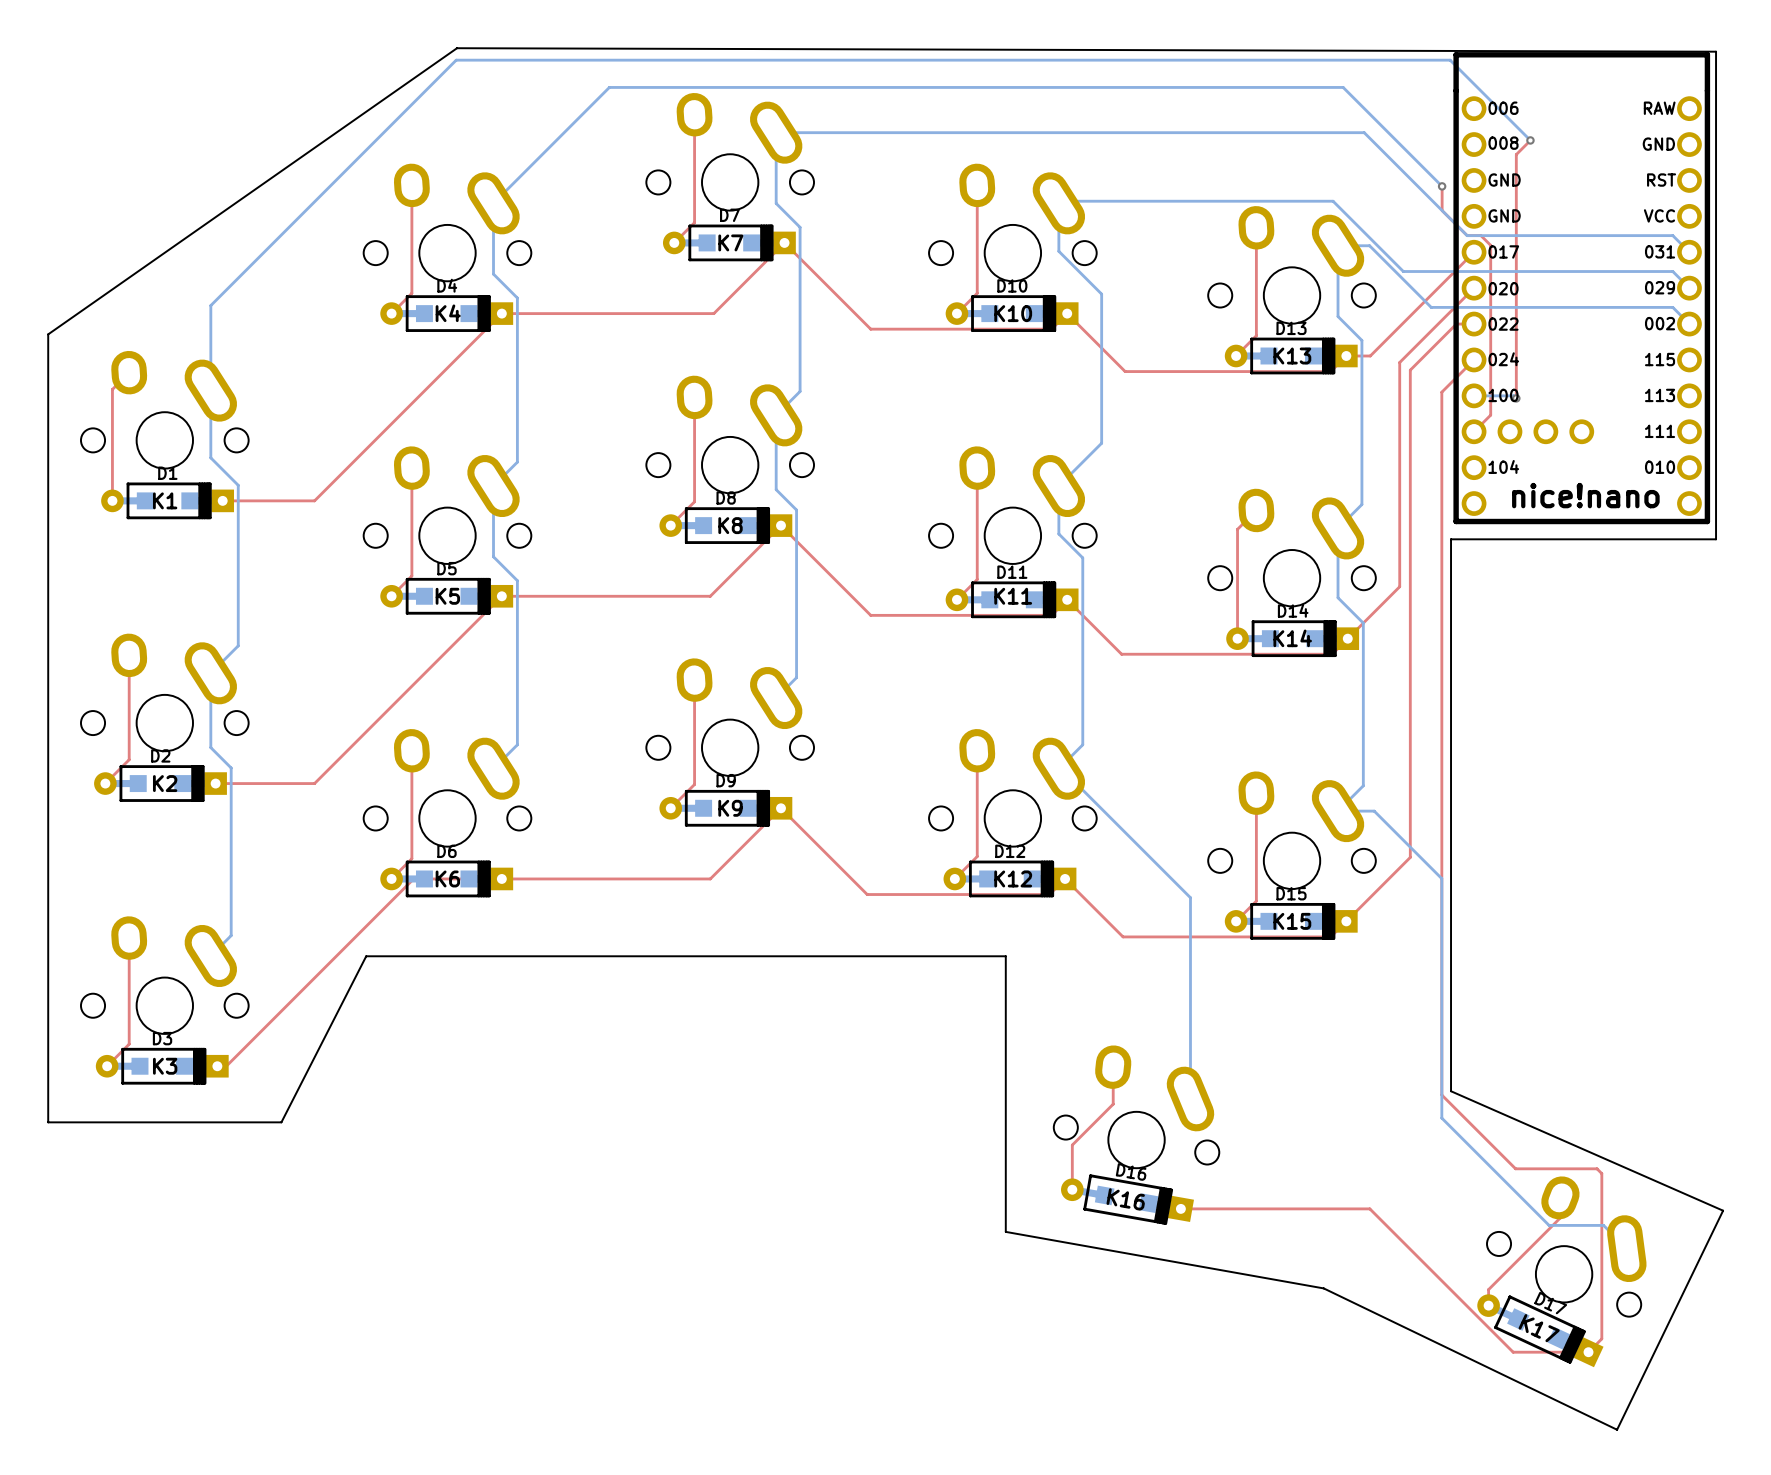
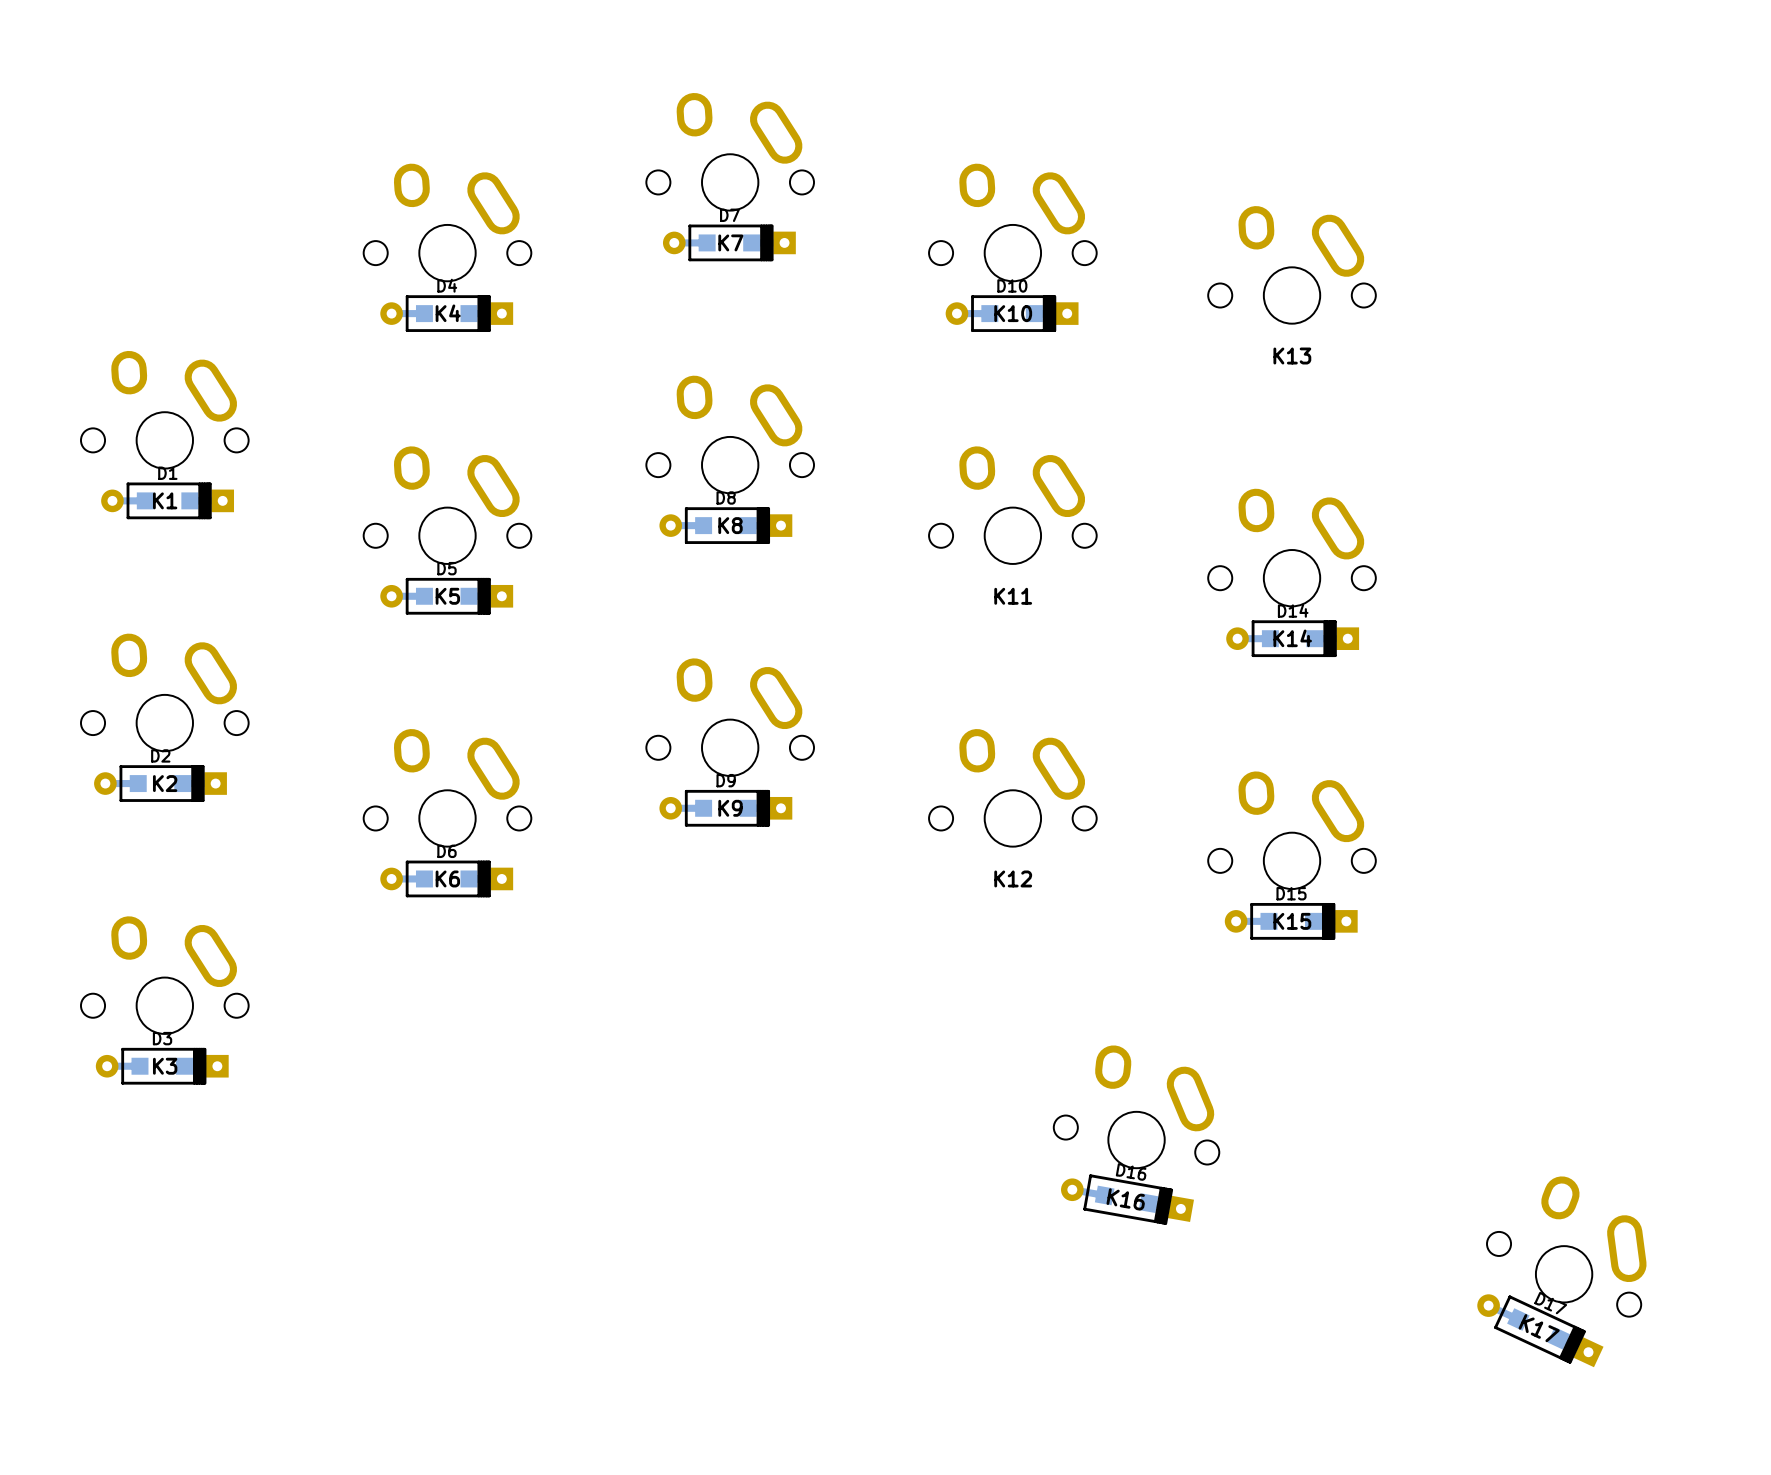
board edge: (457, 48) (1716, 51) (1716, 539) (1451, 539) (1451, 1091) (1723, 1210) (1617, 1429) (1323, 1288) (1005, 1231) (1005, 956) (366, 956) (281, 1122) (48, 1122) (48, 334) (457, 48) -> none
top track: (694, 114) (694, 222) (674, 242) -> none
top track: (1530, 140) (1516, 154) (1516, 398) -> none
bottom track: (1530, 140) (1450, 60) (456, 60) (210, 305) (210, 457) (238, 485) (238, 645) (210, 673) (210, 747) (231, 767) (231, 935) (210, 955) -> none
via: (1530, 140) -> none
top track: (411, 185) (411, 293) (391, 313) -> none
top track: (977, 185) (977, 293) (956, 313) -> none
top track: (1442, 186) (1442, 210) (1467, 235) (1480, 235) (1490, 245) (1490, 415) (1474, 431) -> none
bottom track: (1442, 186) (1343, 87) (609, 87) (493, 203) (493, 274) (517, 298) (517, 462) (493, 486) (493, 556) (517, 580) (517, 744) (493, 768) -> none
via: (1442, 186) -> none
top track: (1256, 227) (1256, 335) (1236, 356) -> none
top track: (1474, 252) (1370, 356) (1346, 356) (1330, 371) (1125, 371) (1067, 313) (1051, 329) (870, 329) (784, 242) (713, 313) (501, 313) (314, 500) (222, 500) -> none
bottom track: (1689, 252) (1672, 235) (1467, 235) (1364, 132) (776, 132) (776, 203) (800, 227) (800, 391) (776, 415) (776, 489) (796, 510) (796, 677) (776, 698) -> none
top track: (1474, 288) (1399, 362) (1399, 586) (1332, 654) (1121, 654) (1067, 599) (1051, 615) (870, 615) (780, 525) (710, 596) (501, 596) (314, 783) (215, 783) -> none
part: (1581, 288) -> none
bottom track: (1689, 288) (1672, 271) (1403, 271) (1333, 201) (1061, 201) (1058, 203) (1058, 251) (1101, 294) (1101, 443) (1058, 486) (1058, 534) (1082, 557) (1082, 744) (1058, 768) (1061, 768) (1190, 897) (1190, 1099) -> none
top track: (1474, 324) (1456, 324) (1410, 370) (1410, 857) (1330, 936) (1123, 936) (1065, 878) (1049, 894) (867, 894) (780, 808) (710, 878) (413, 878) (226, 1066) (217, 1066) -> none
bottom track: (1689, 324) (1672, 307) (1431, 307) (1369, 245) (1338, 245) (1338, 316) (1361, 340) (1361, 504) (1338, 528) (1338, 597) (1363, 623) (1363, 785) (1338, 811) (1374, 811) (1441, 878) (1441, 1118) (1549, 1225) (1603, 1225) (1626, 1248) -> none
D13: (1291, 356) -> none
top track: (1474, 359) (1441, 392) (1441, 1095) (1515, 1168) (1597, 1168) (1601, 1173) (1601, 1338) (1588, 1352) (1513, 1352) (1369, 1208) (1180, 1208) -> none
top track: (129, 372) (112, 389) (112, 500) -> none
bottom track: (1474, 395) (1513, 395) (1516, 398) -> none
top track: (694, 397) (694, 501) (670, 525) -> none
via: (1516, 398) -> none
top track: (411, 468) (411, 575) (391, 596) -> none
top track: (977, 468) (977, 579) (956, 599) -> none
top track: (1256, 510) (1237, 529) (1237, 638) -> none
D11: (1012, 599) -> none
top track: (129, 655) (129, 759) (105, 783) -> none
top track: (694, 680) (694, 784) (670, 808) -> none
top track: (411, 750) (411, 858) (391, 878) -> none
top track: (977, 750) (977, 856) (954, 878) -> none
top track: (1256, 793) (1256, 901) (1236, 921) -> none
D12: (1009, 878) -> none
top track: (129, 938) (129, 1044) (107, 1066) -> none
top track: (1113, 1067) (1113, 1104) (1072, 1145) (1072, 1189) -> none
top track: (1560, 1197) (1560, 1217) (1488, 1289) (1488, 1305) -> none

